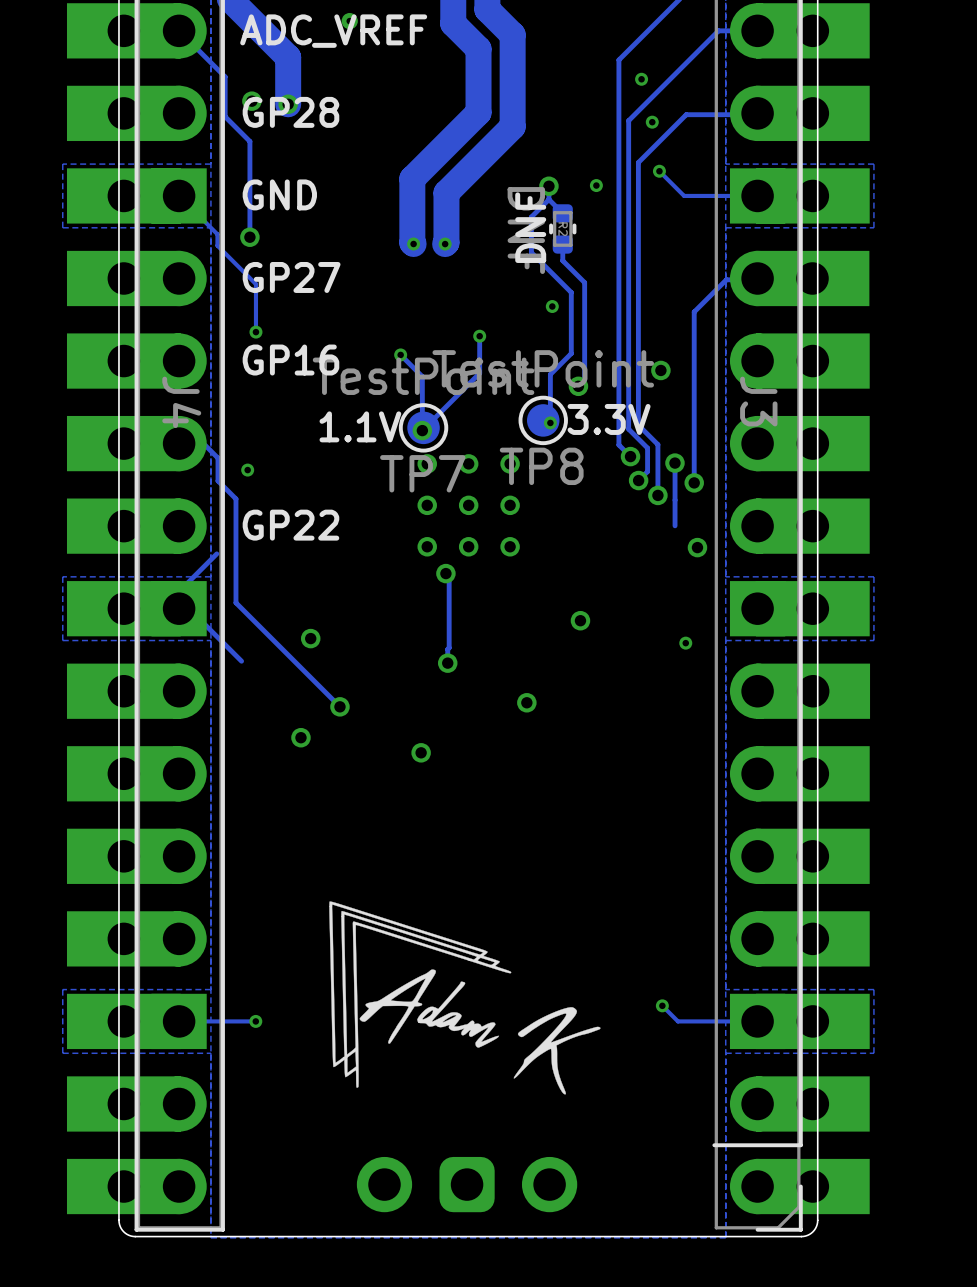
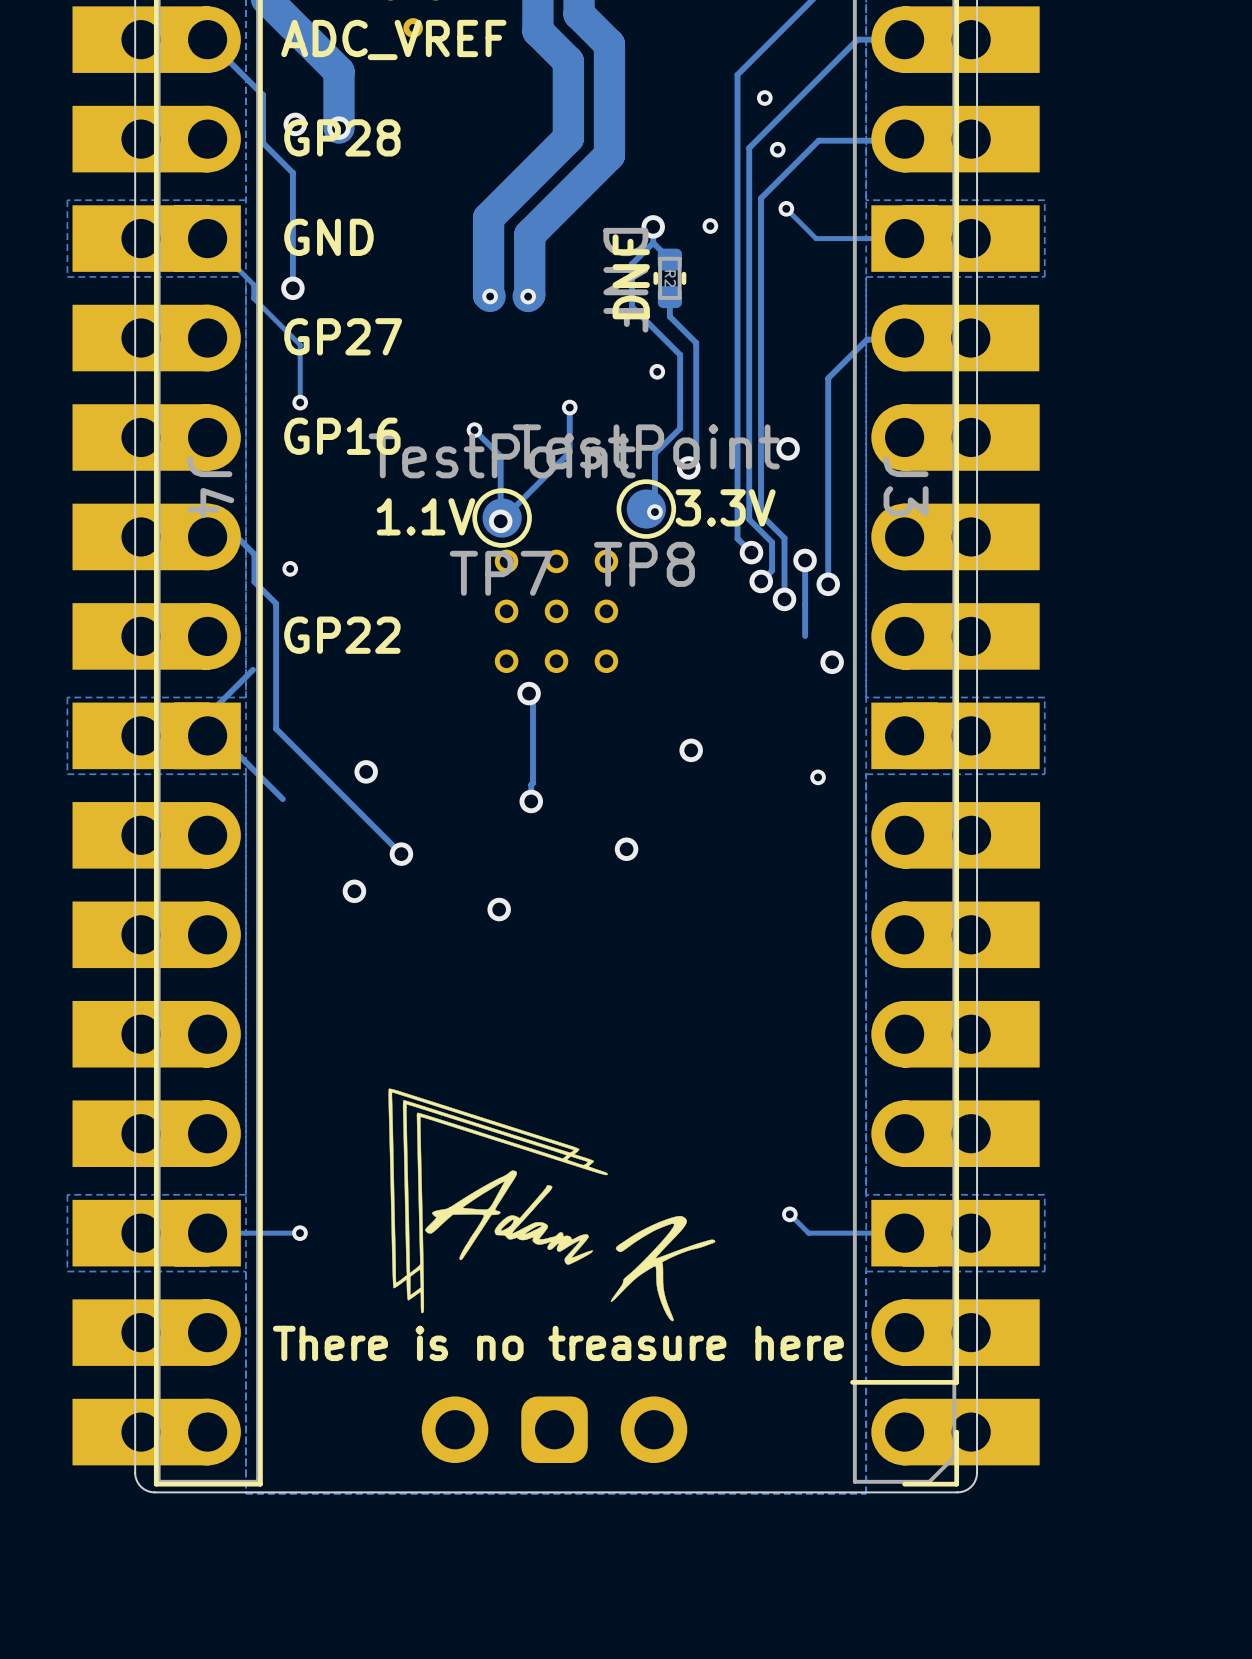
text: none -> There is no treasure here (558, 1343)

